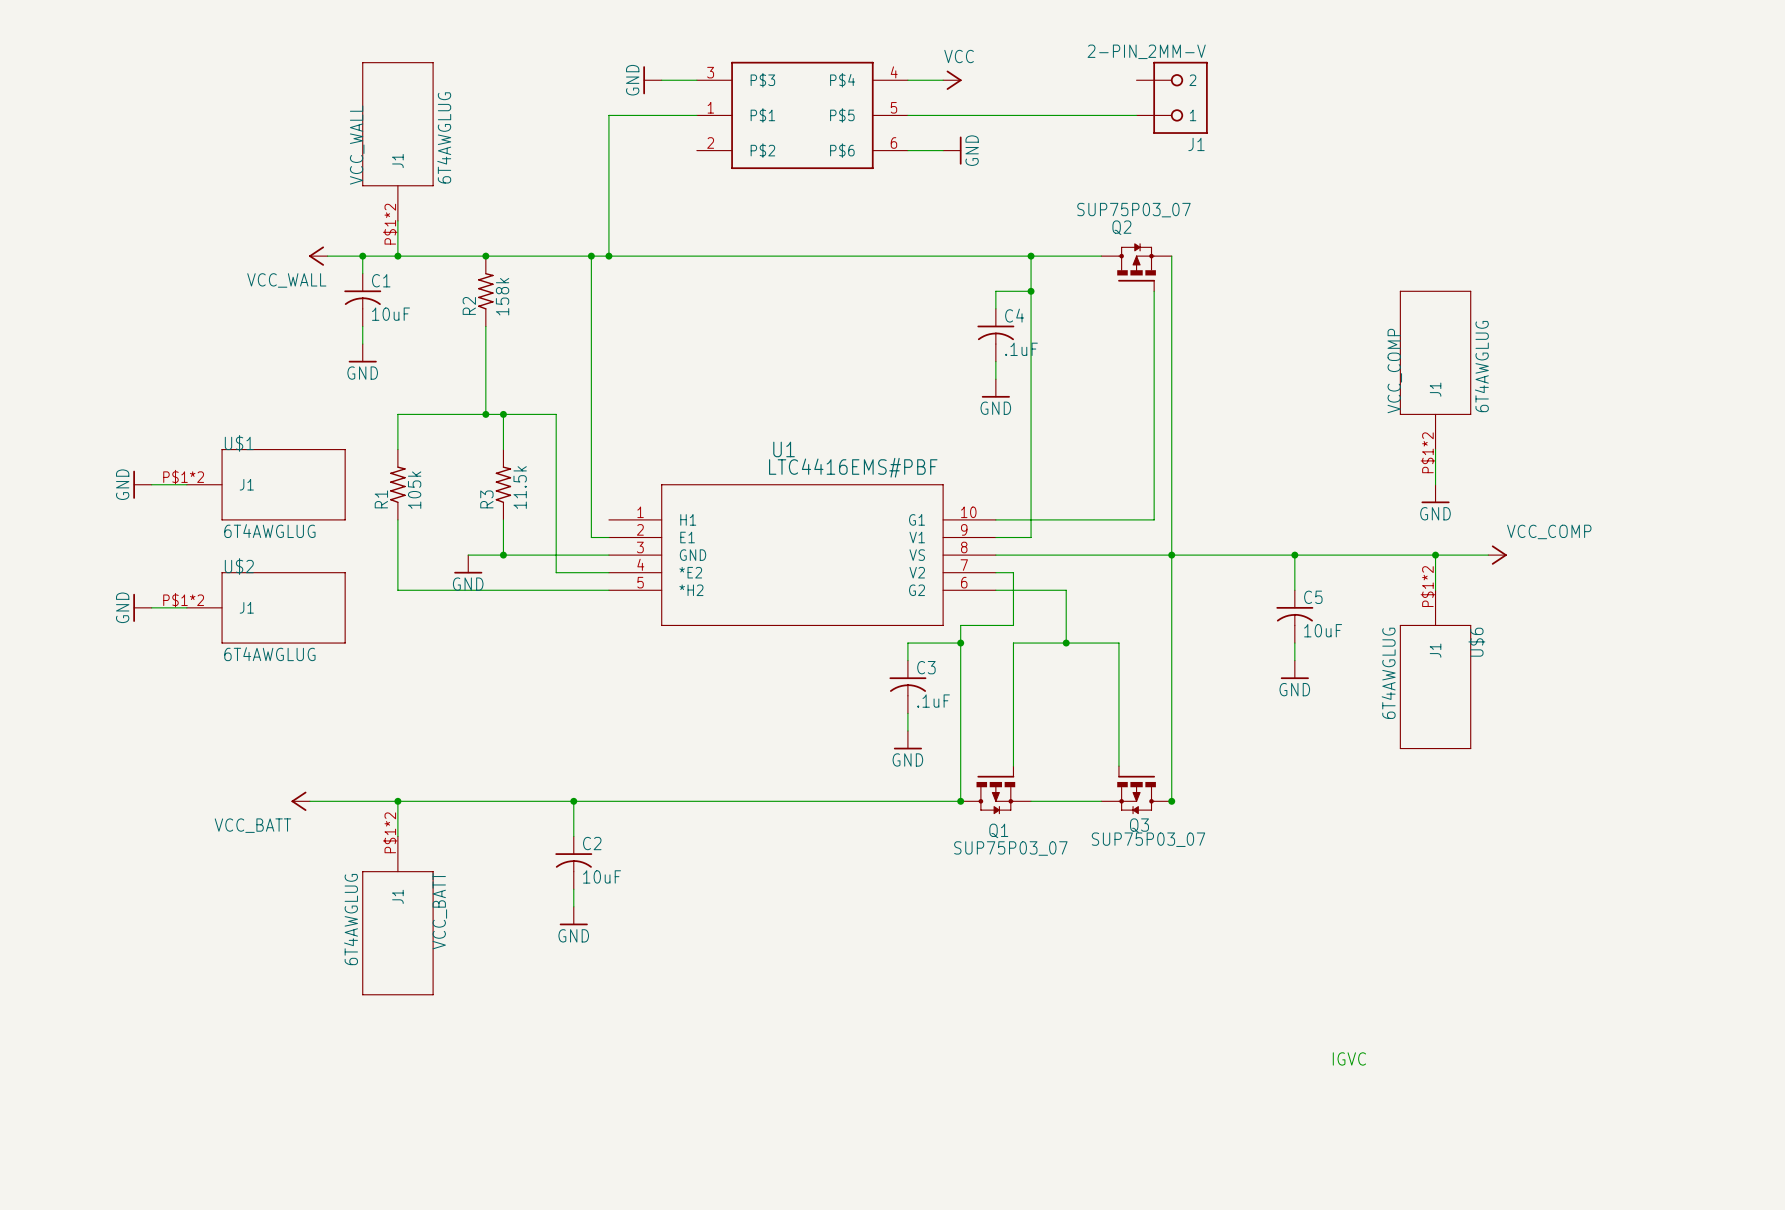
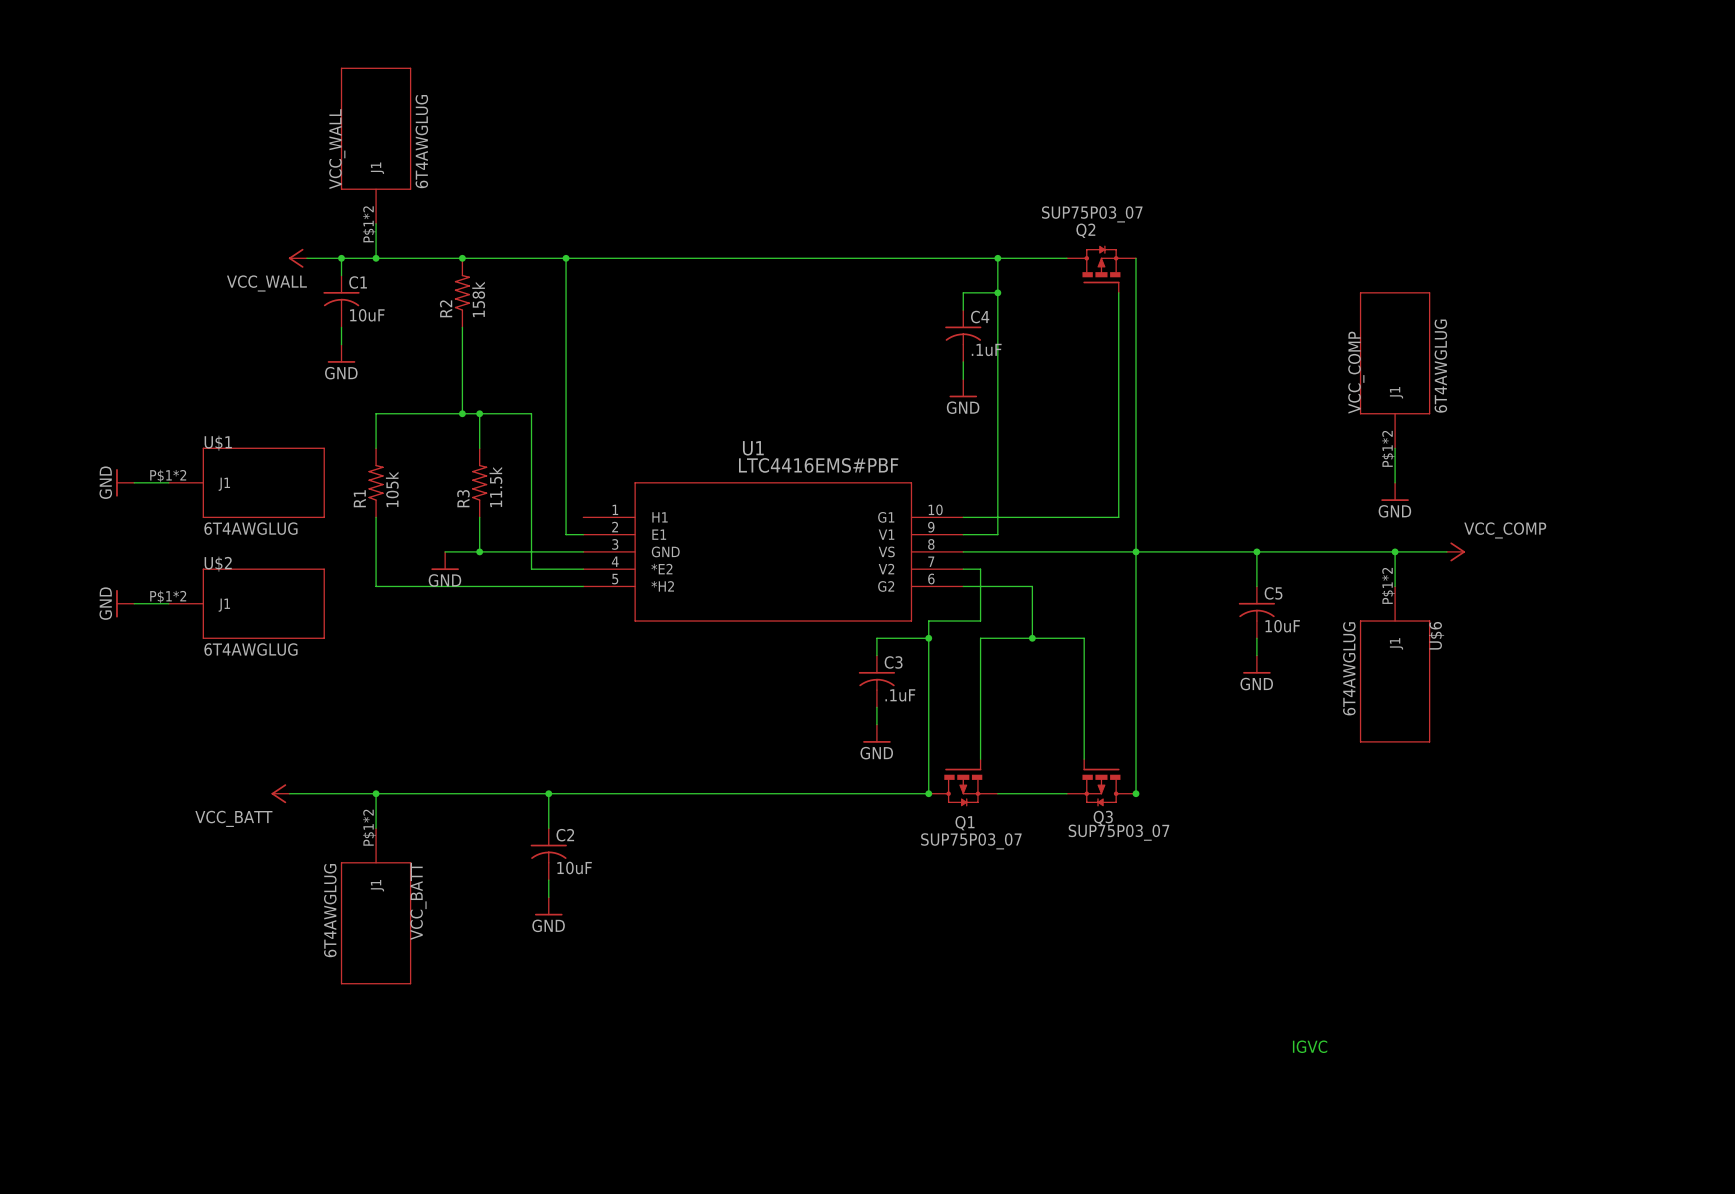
power symbol: GND (652, 80) -> none
wire: (661, 80) (696, 80) -> none
wire: (907, 80) (943, 80) -> none
power symbol: VCC (952, 80) -> none
J1: 2-PIN_2MM-V (1172, 97) -> none
wire: (696, 115) (608, 115) (608, 256) -> none
part: (802, 115) -> none
wire: (907, 115) (1136, 115) -> none
wire: (907, 150) (943, 150) -> none
power symbol: GND (952, 150) -> none
junction: (608, 256) -> none

